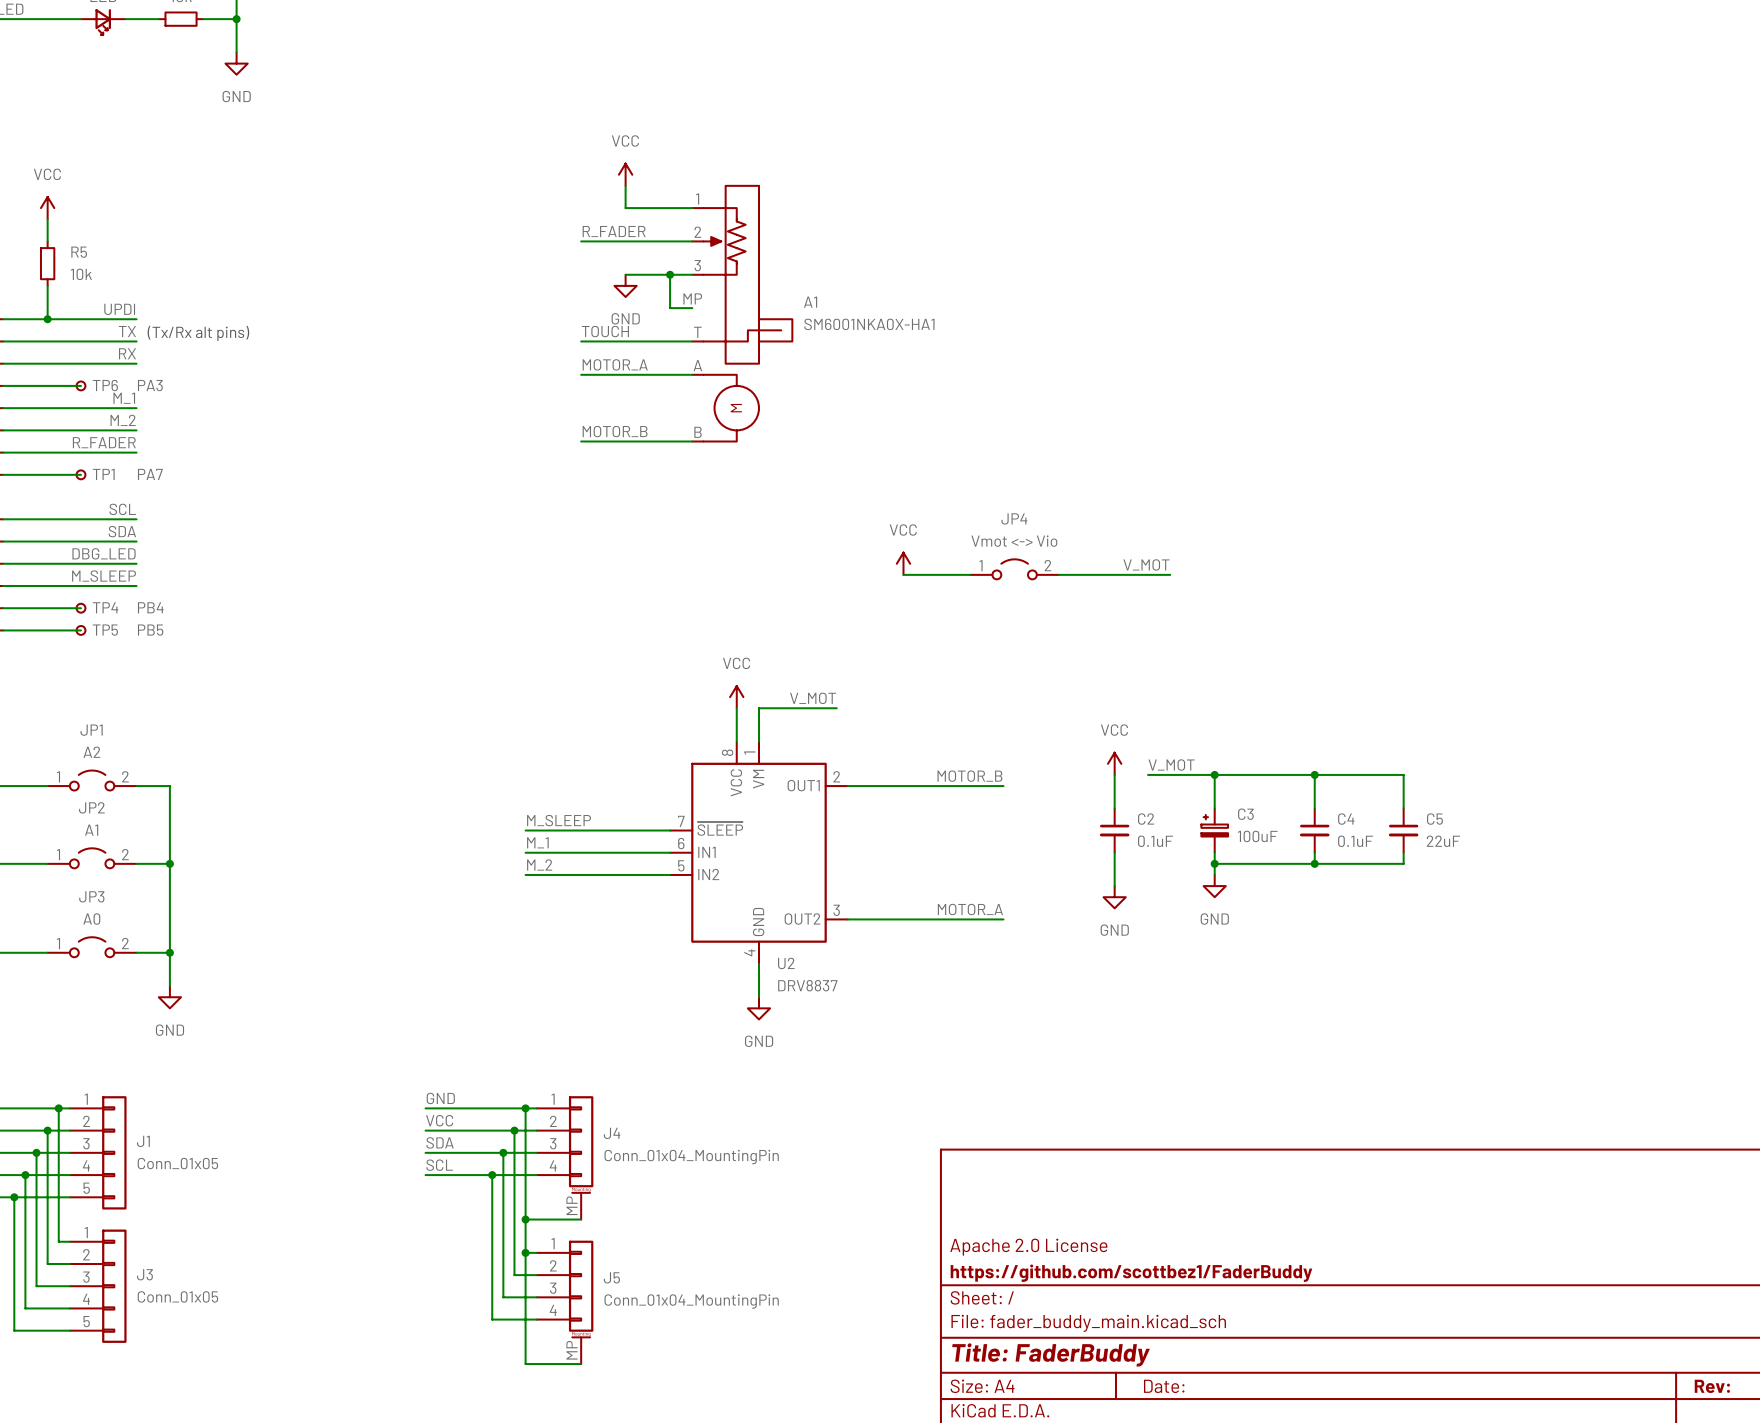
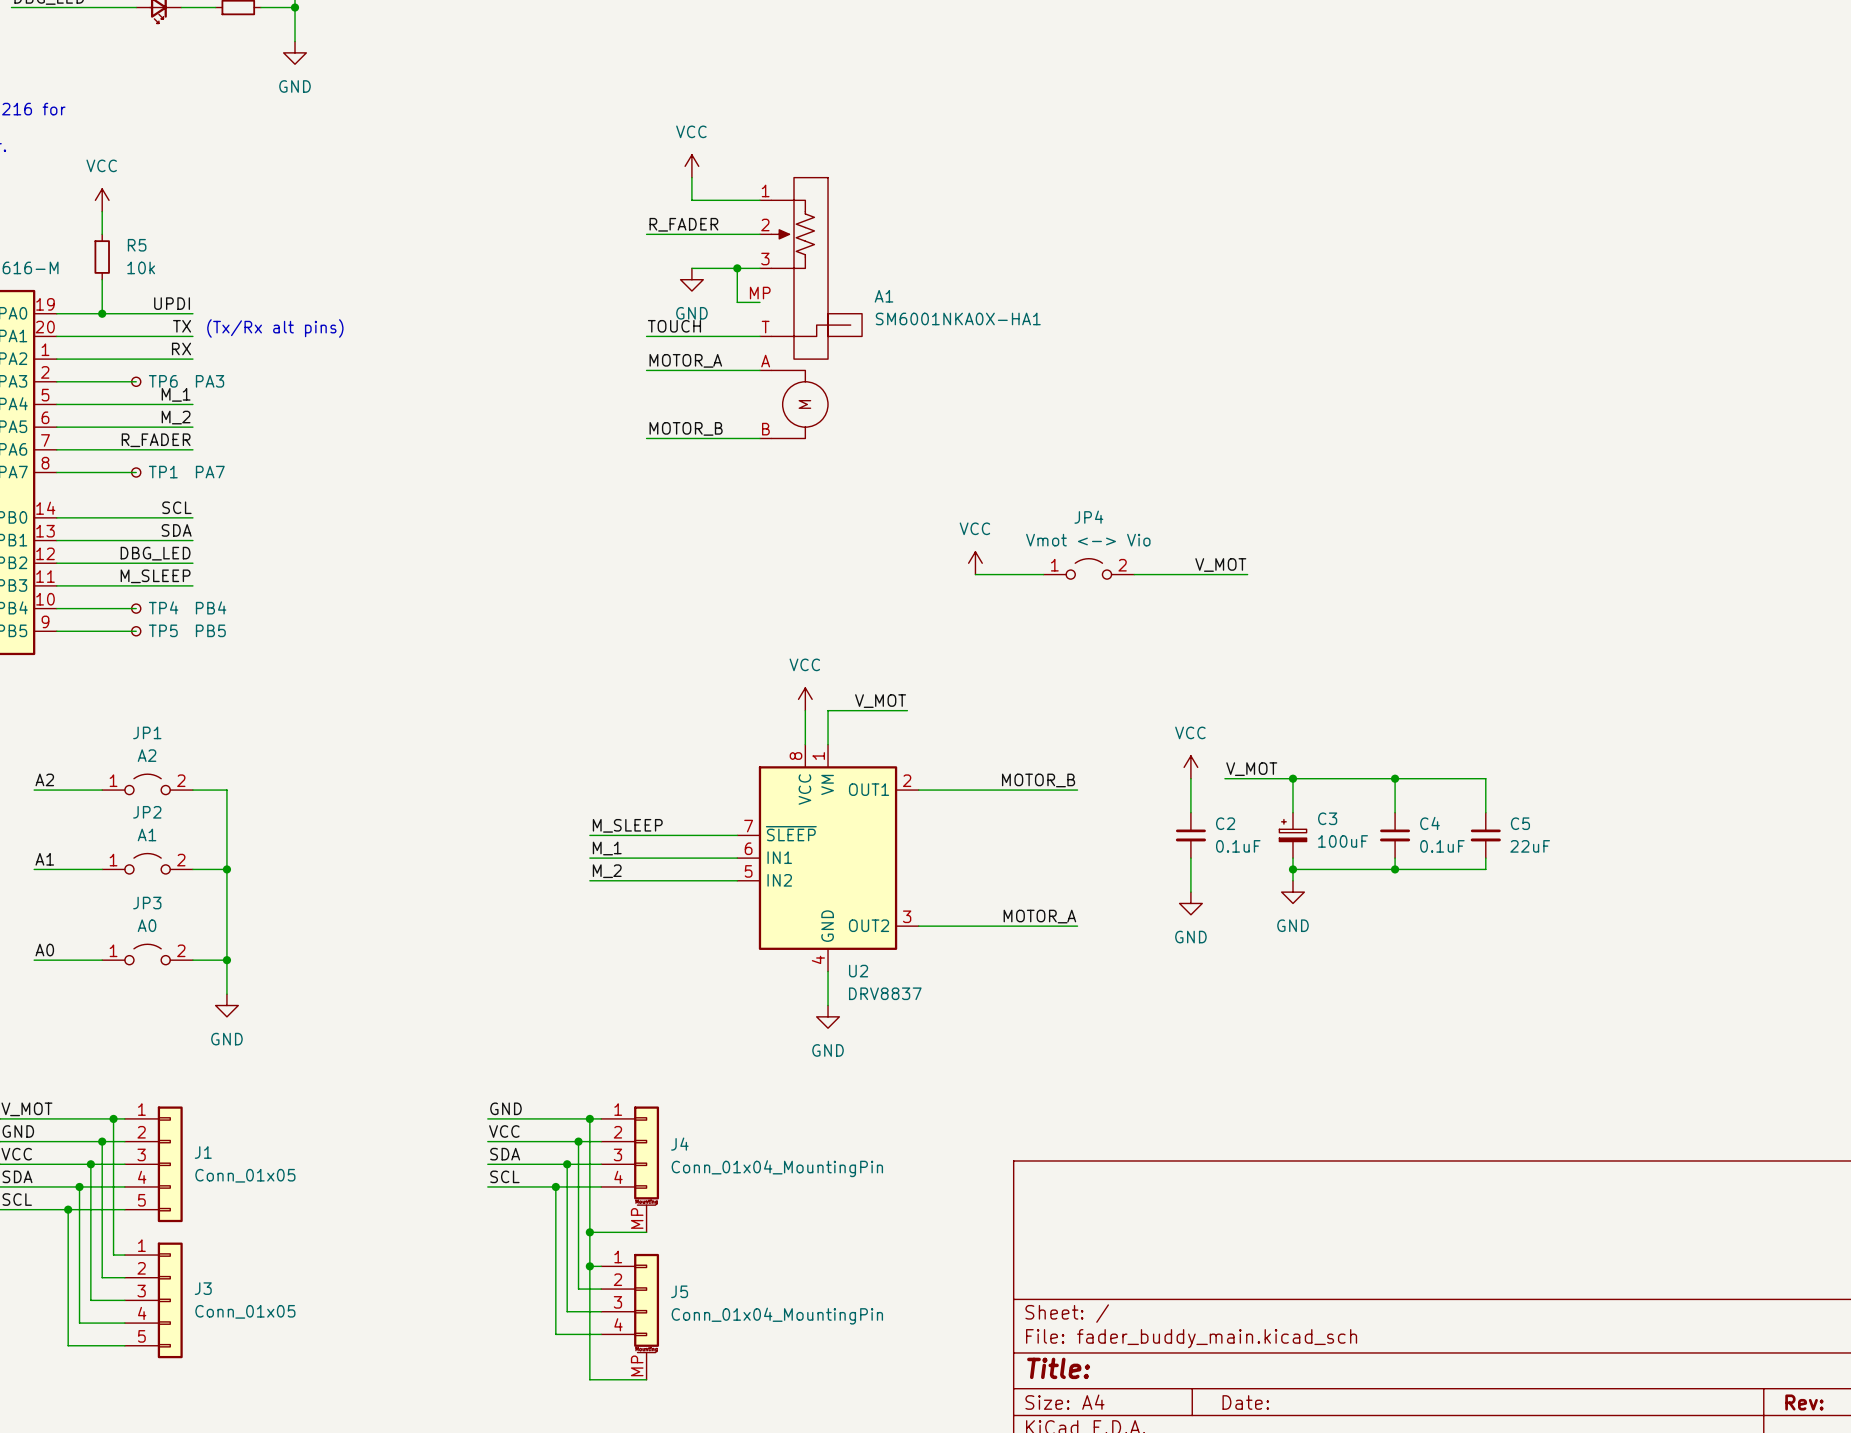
title block: Apache 2.0 License (1028, 1247) -> none
title block: https://github.com/scottbez1/FaderBuddy (1131, 1273) -> none
title block: Title: FaderBuddy (1051, 1354) -> Title: (1058, 1368)

